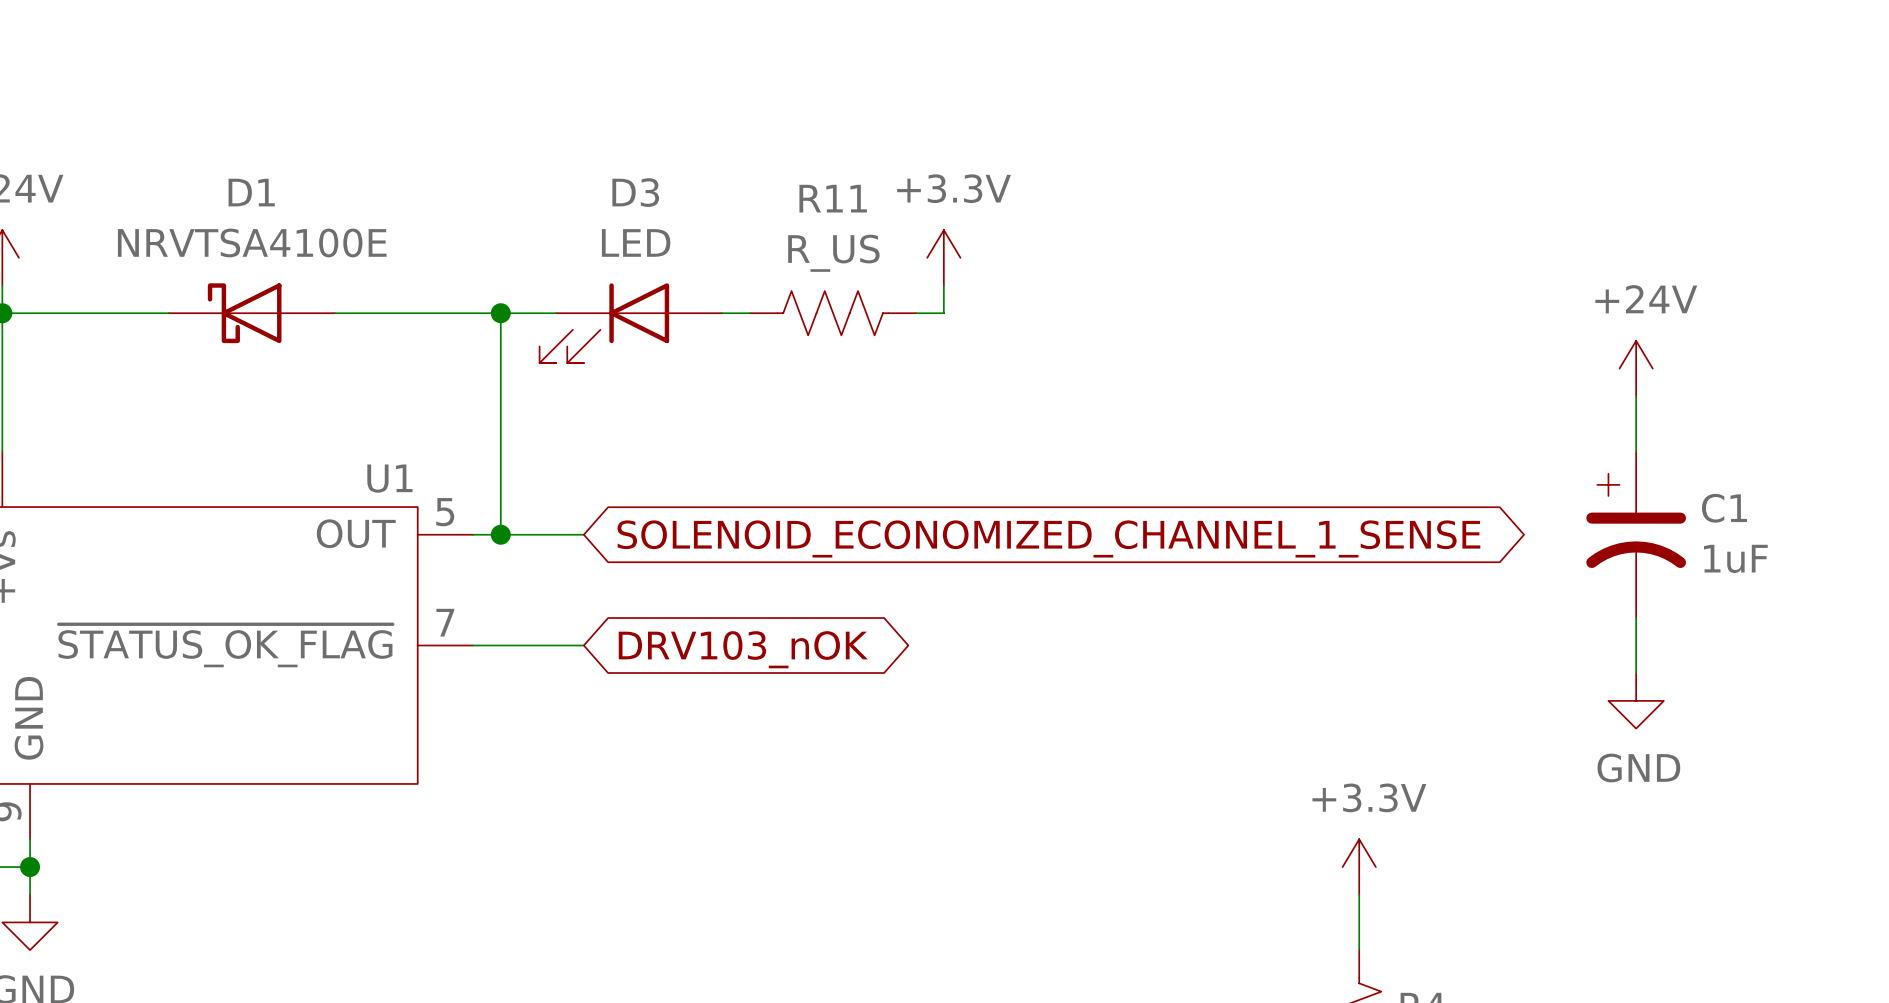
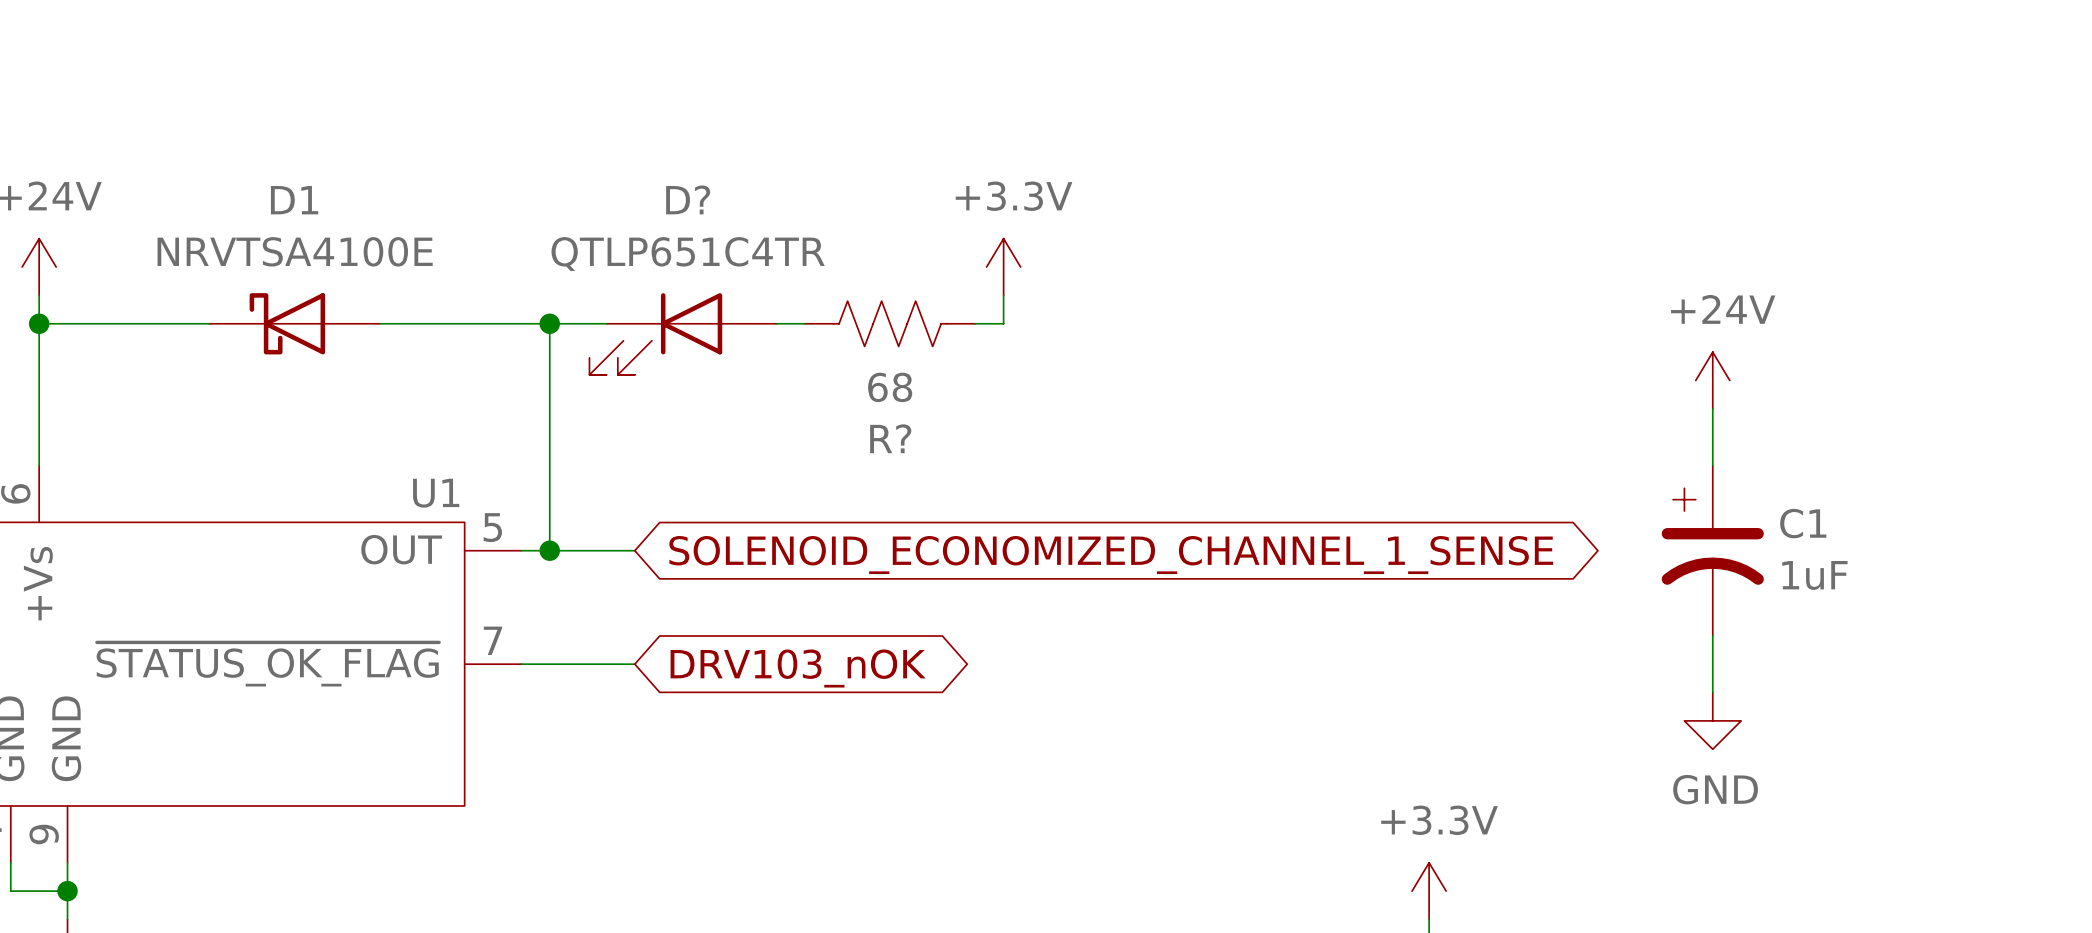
D3 name: D3 (635, 192) -> D? (688, 199)
R11 name: R11 (833, 198) -> R? (890, 438)
D3 value: LED (636, 242) -> QTLP651C4TR (688, 254)
R11 value: R_US (833, 253) -> 68 (890, 387)

